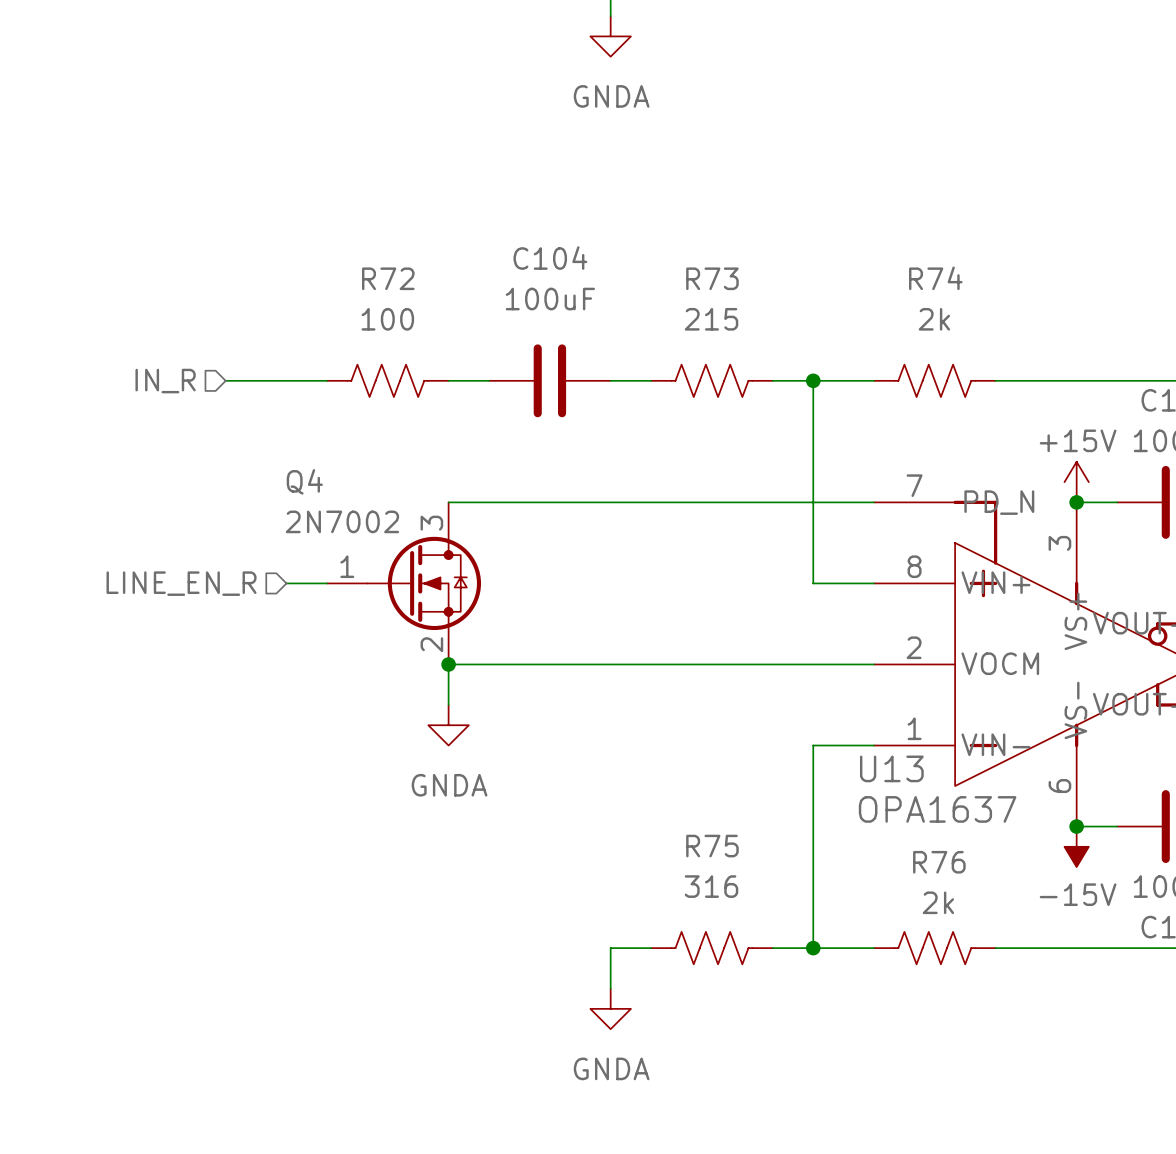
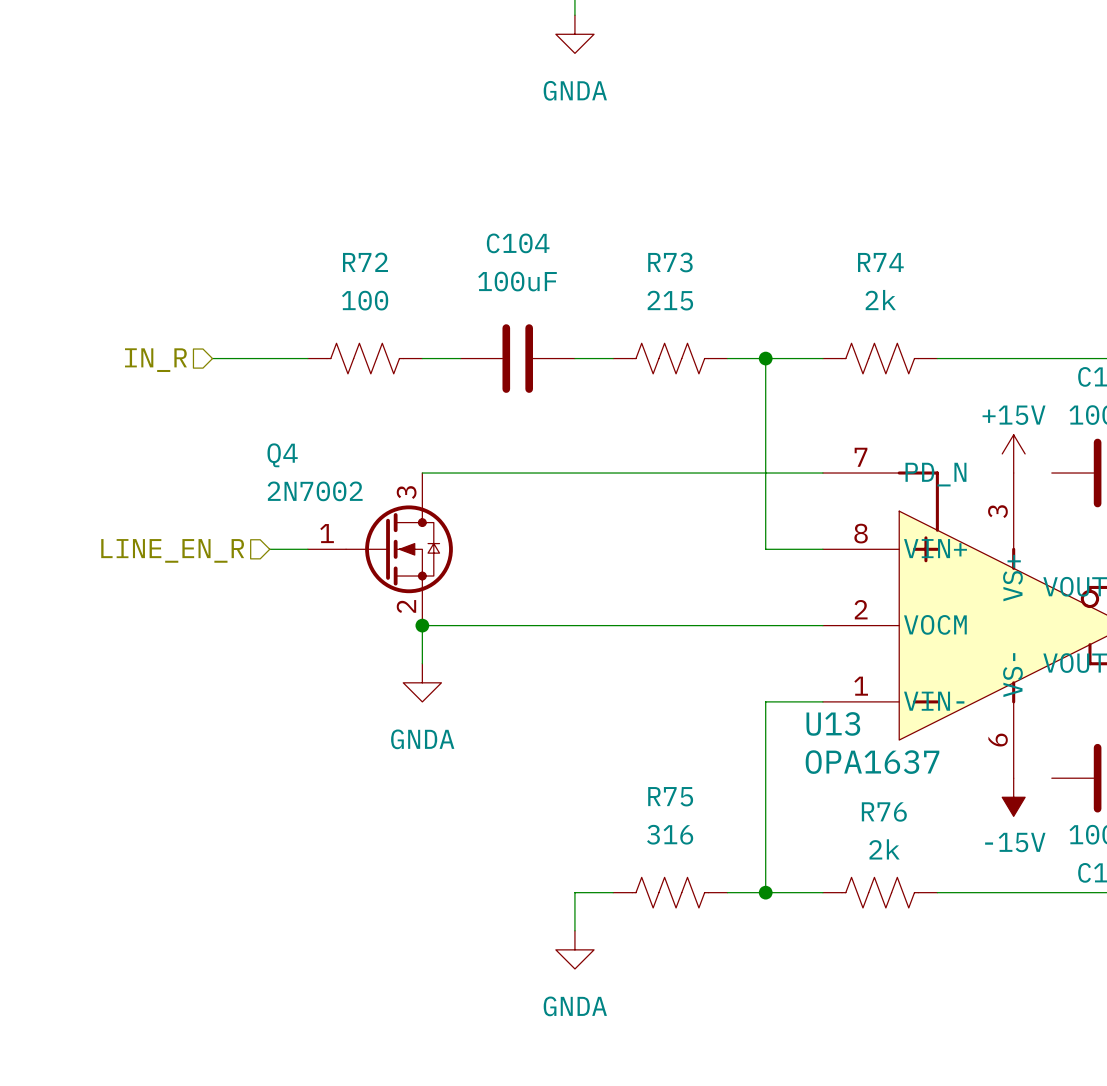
wire: (1076, 502) (1117, 502) -> none
junction: (1076, 502) -> none
wire: (1076, 826) (1117, 826) -> none
junction: (1076, 826) -> none

